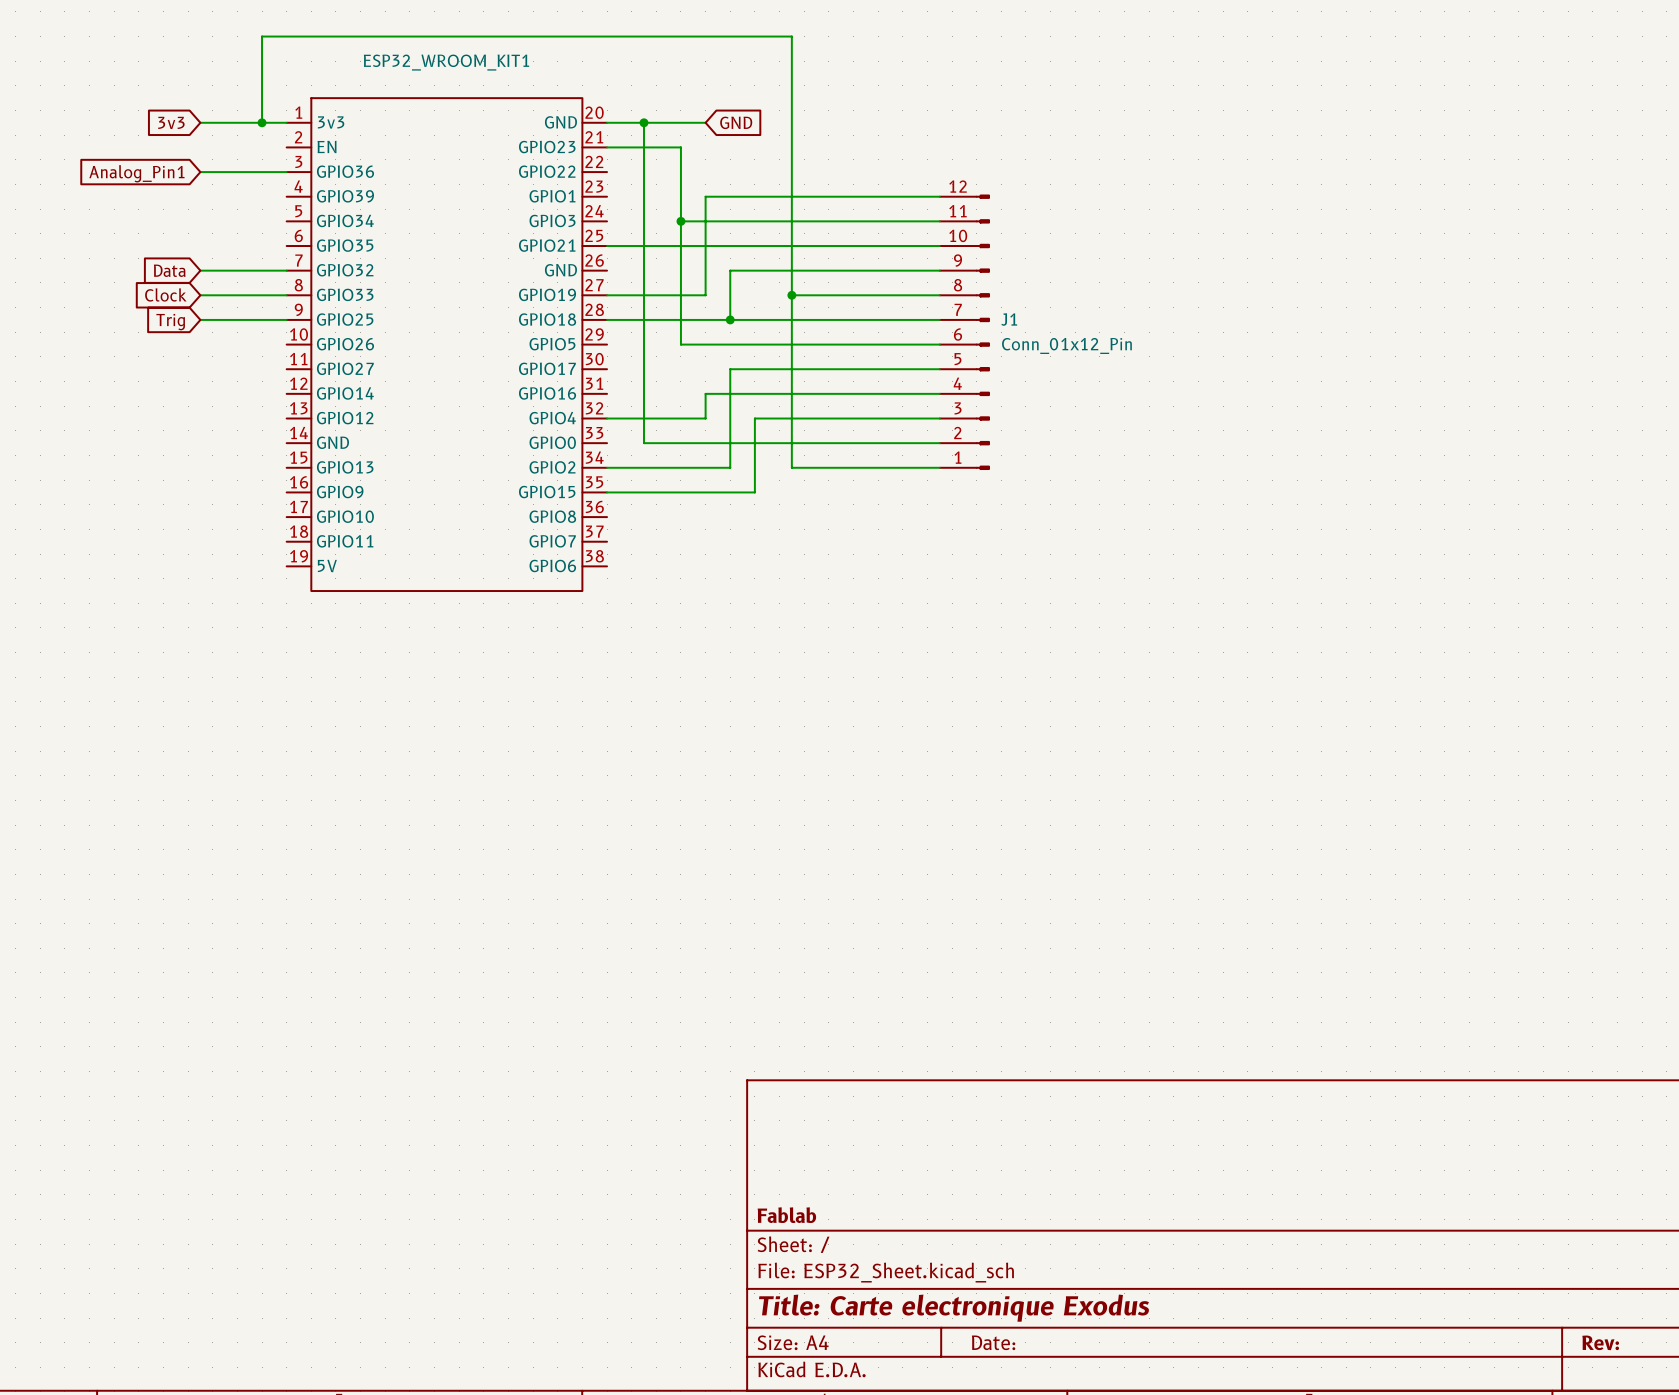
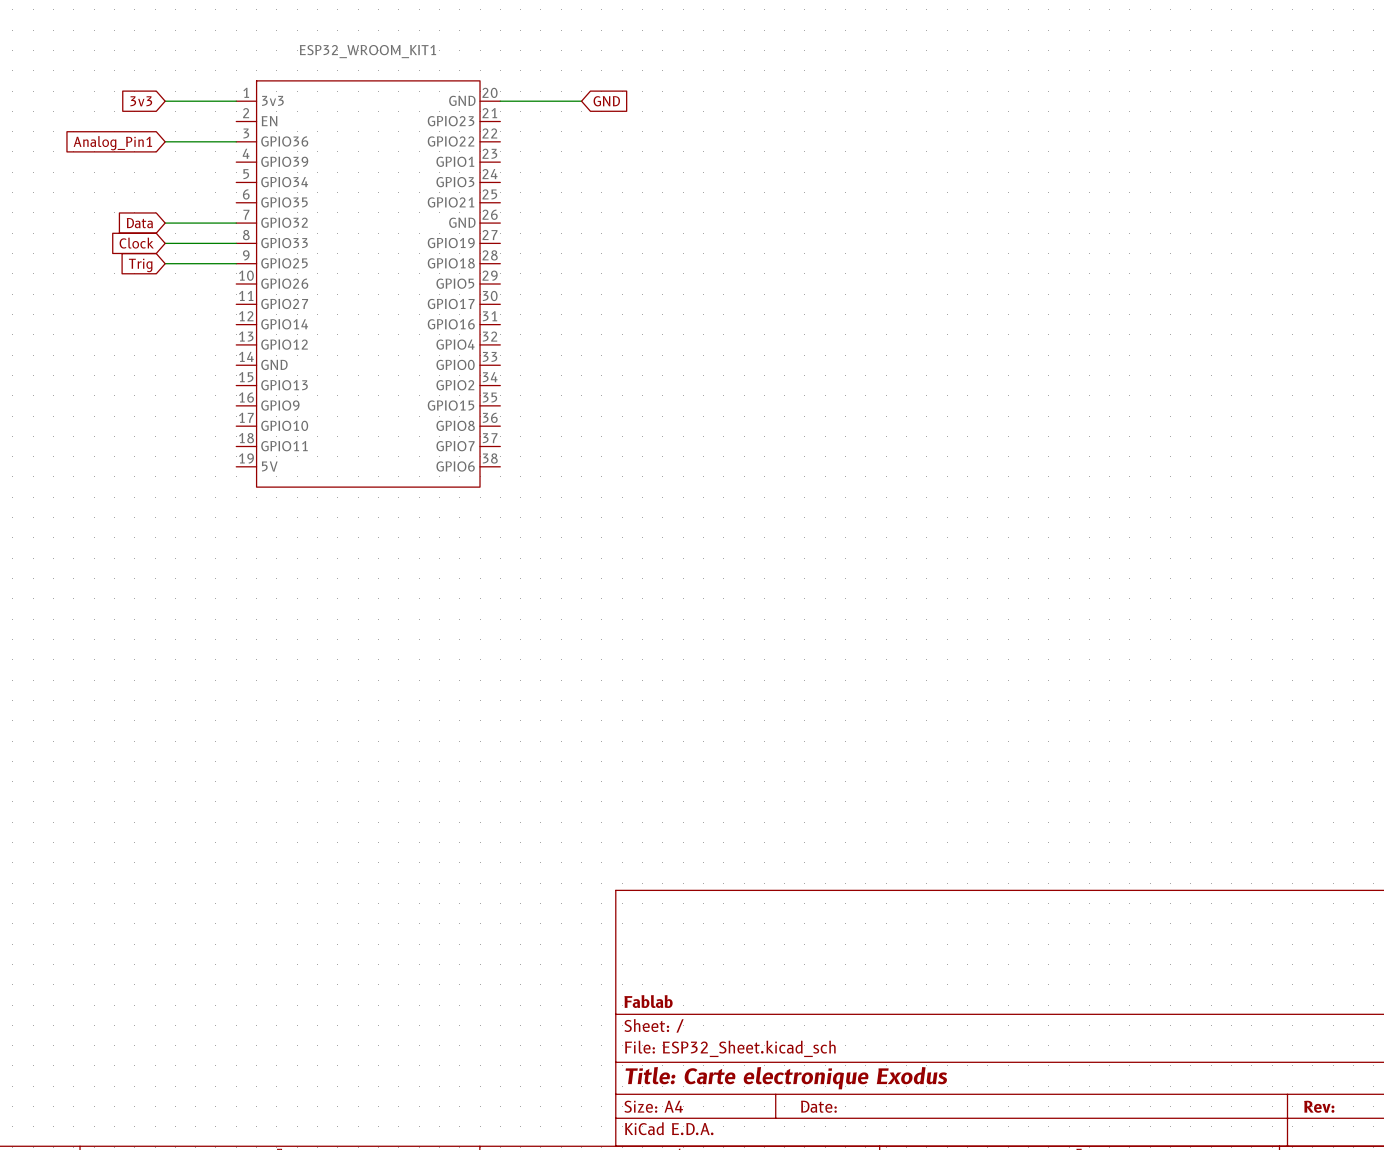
wire: (262, 122) (262, 36) (791, 36) (791, 467) (939, 467) -> none
junction: (262, 122) -> none
wire: (644, 122) (644, 443) (939, 443) -> none
junction: (644, 122) -> none
wire: (607, 147) (680, 147) (680, 344) (939, 344) -> none
wire: (939, 196) (705, 196) (705, 295) (607, 295) -> none
wire: (680, 221) (939, 221) -> none
junction: (680, 221) -> none
wire: (607, 246) (939, 246) -> none
wire: (939, 270) (730, 270) (730, 319) -> none
wire: (791, 295) (939, 295) -> none
junction: (791, 295) -> none
wire: (607, 319) (939, 319) -> none
junction: (730, 319) -> none
J1: Conn_01x12_Pin (964, 332) -> none
wire: (939, 369) (730, 369) (730, 467) (607, 467) -> none
wire: (939, 393) (705, 393) (705, 418) (607, 418) -> none
wire: (939, 418) (754, 418) (754, 492) (607, 492) -> none

